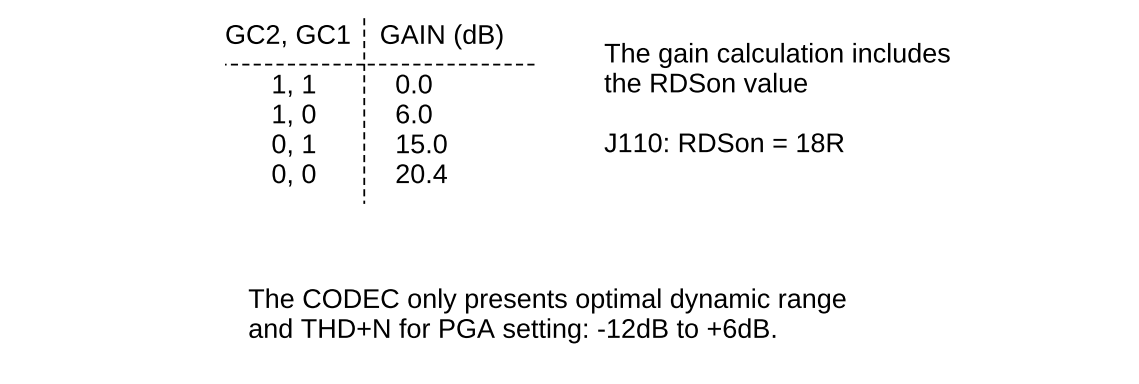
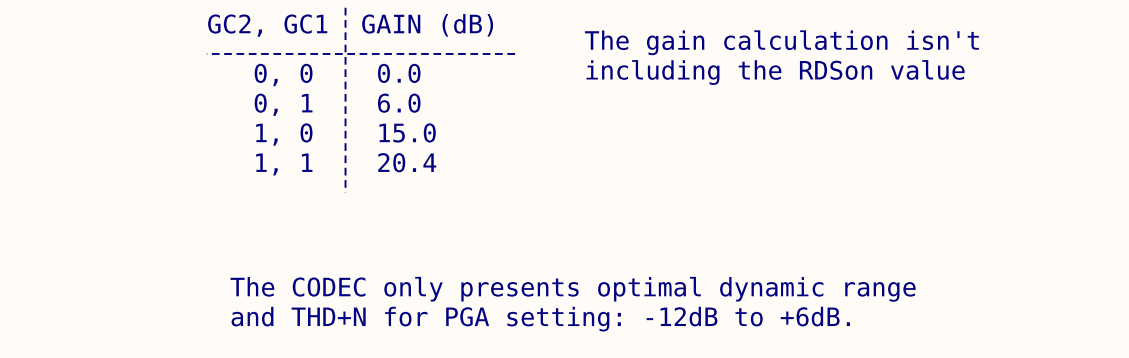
text: The gain calculation includes (777, 55) -> The gain calculation isn't (781, 42)
text: the RDSon value (705, 82) -> including the RDSon value (775, 72)
text: 1, 1 (294, 85) -> 0, 0 (283, 75)
text: 1, 0 (294, 115) -> 0, 1 (283, 104)
text: J110: RDSon = 18R (724, 142) -> none
text: 0, 1 (293, 145) -> 1, 0 (284, 134)
text: 0, 0 (293, 175) -> 1, 1 (284, 164)

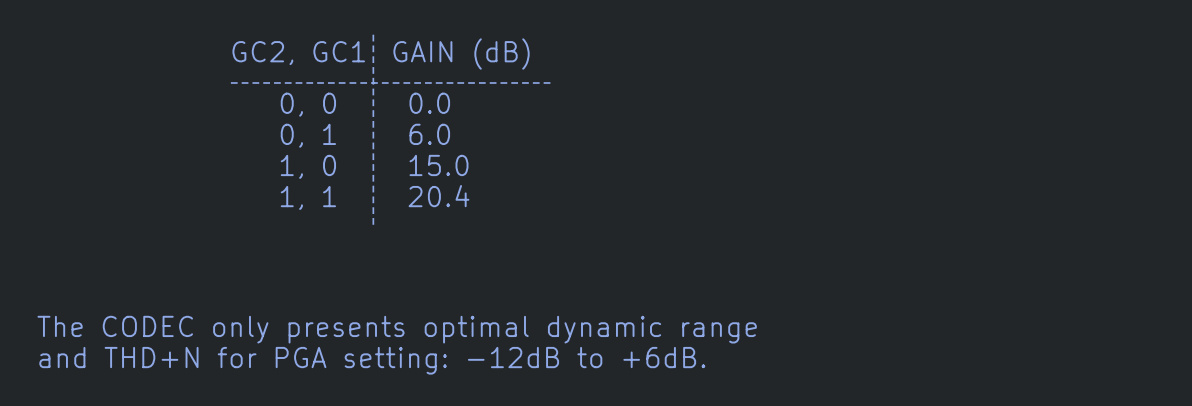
text: The gain calculation isn't (781, 42) -> none
text: including the RDSon value (775, 72) -> none
text position: The CODEC only presents optimal dynamic range (573, 289) -> The CODEC only presents optimal dynamic range (397, 329)
text position: and THD+N for PGA setting: -12dB to +6dB. (540, 319) -> and THD+N for PGA setting: -12dB to +6dB. (372, 360)

